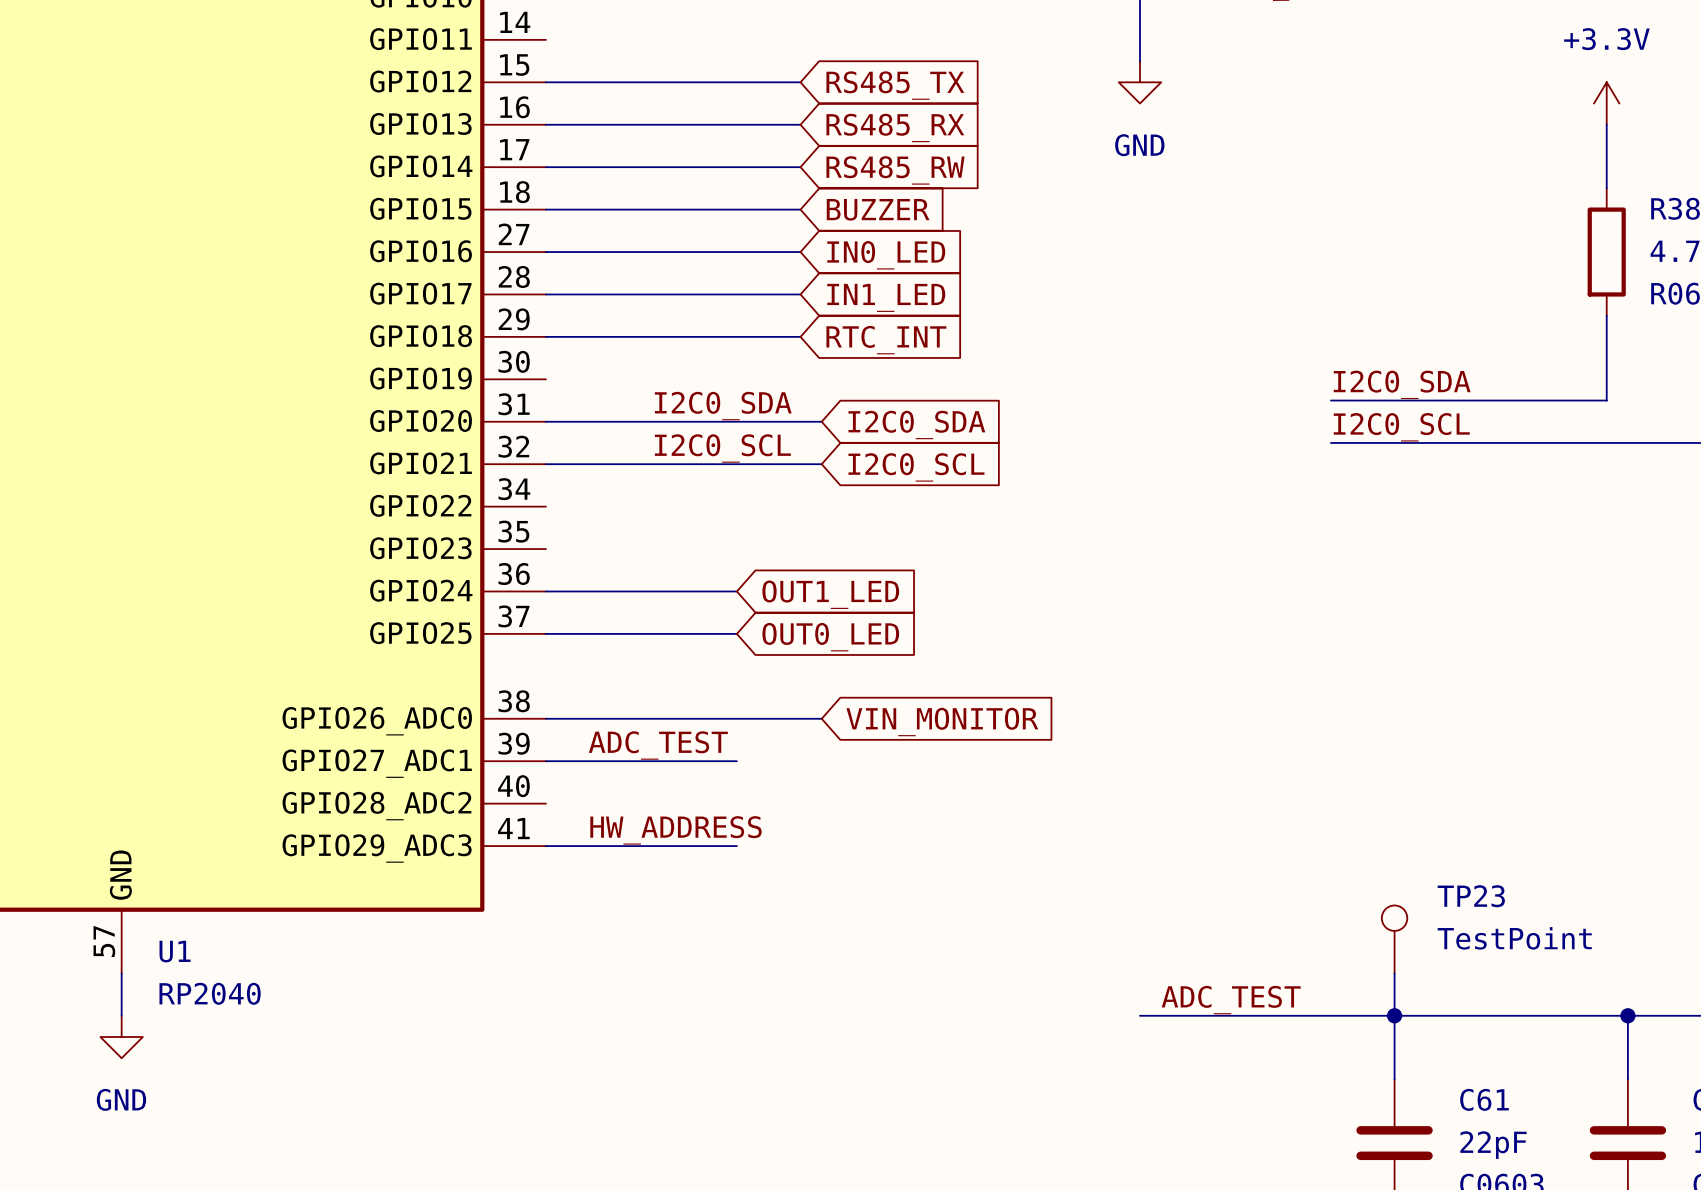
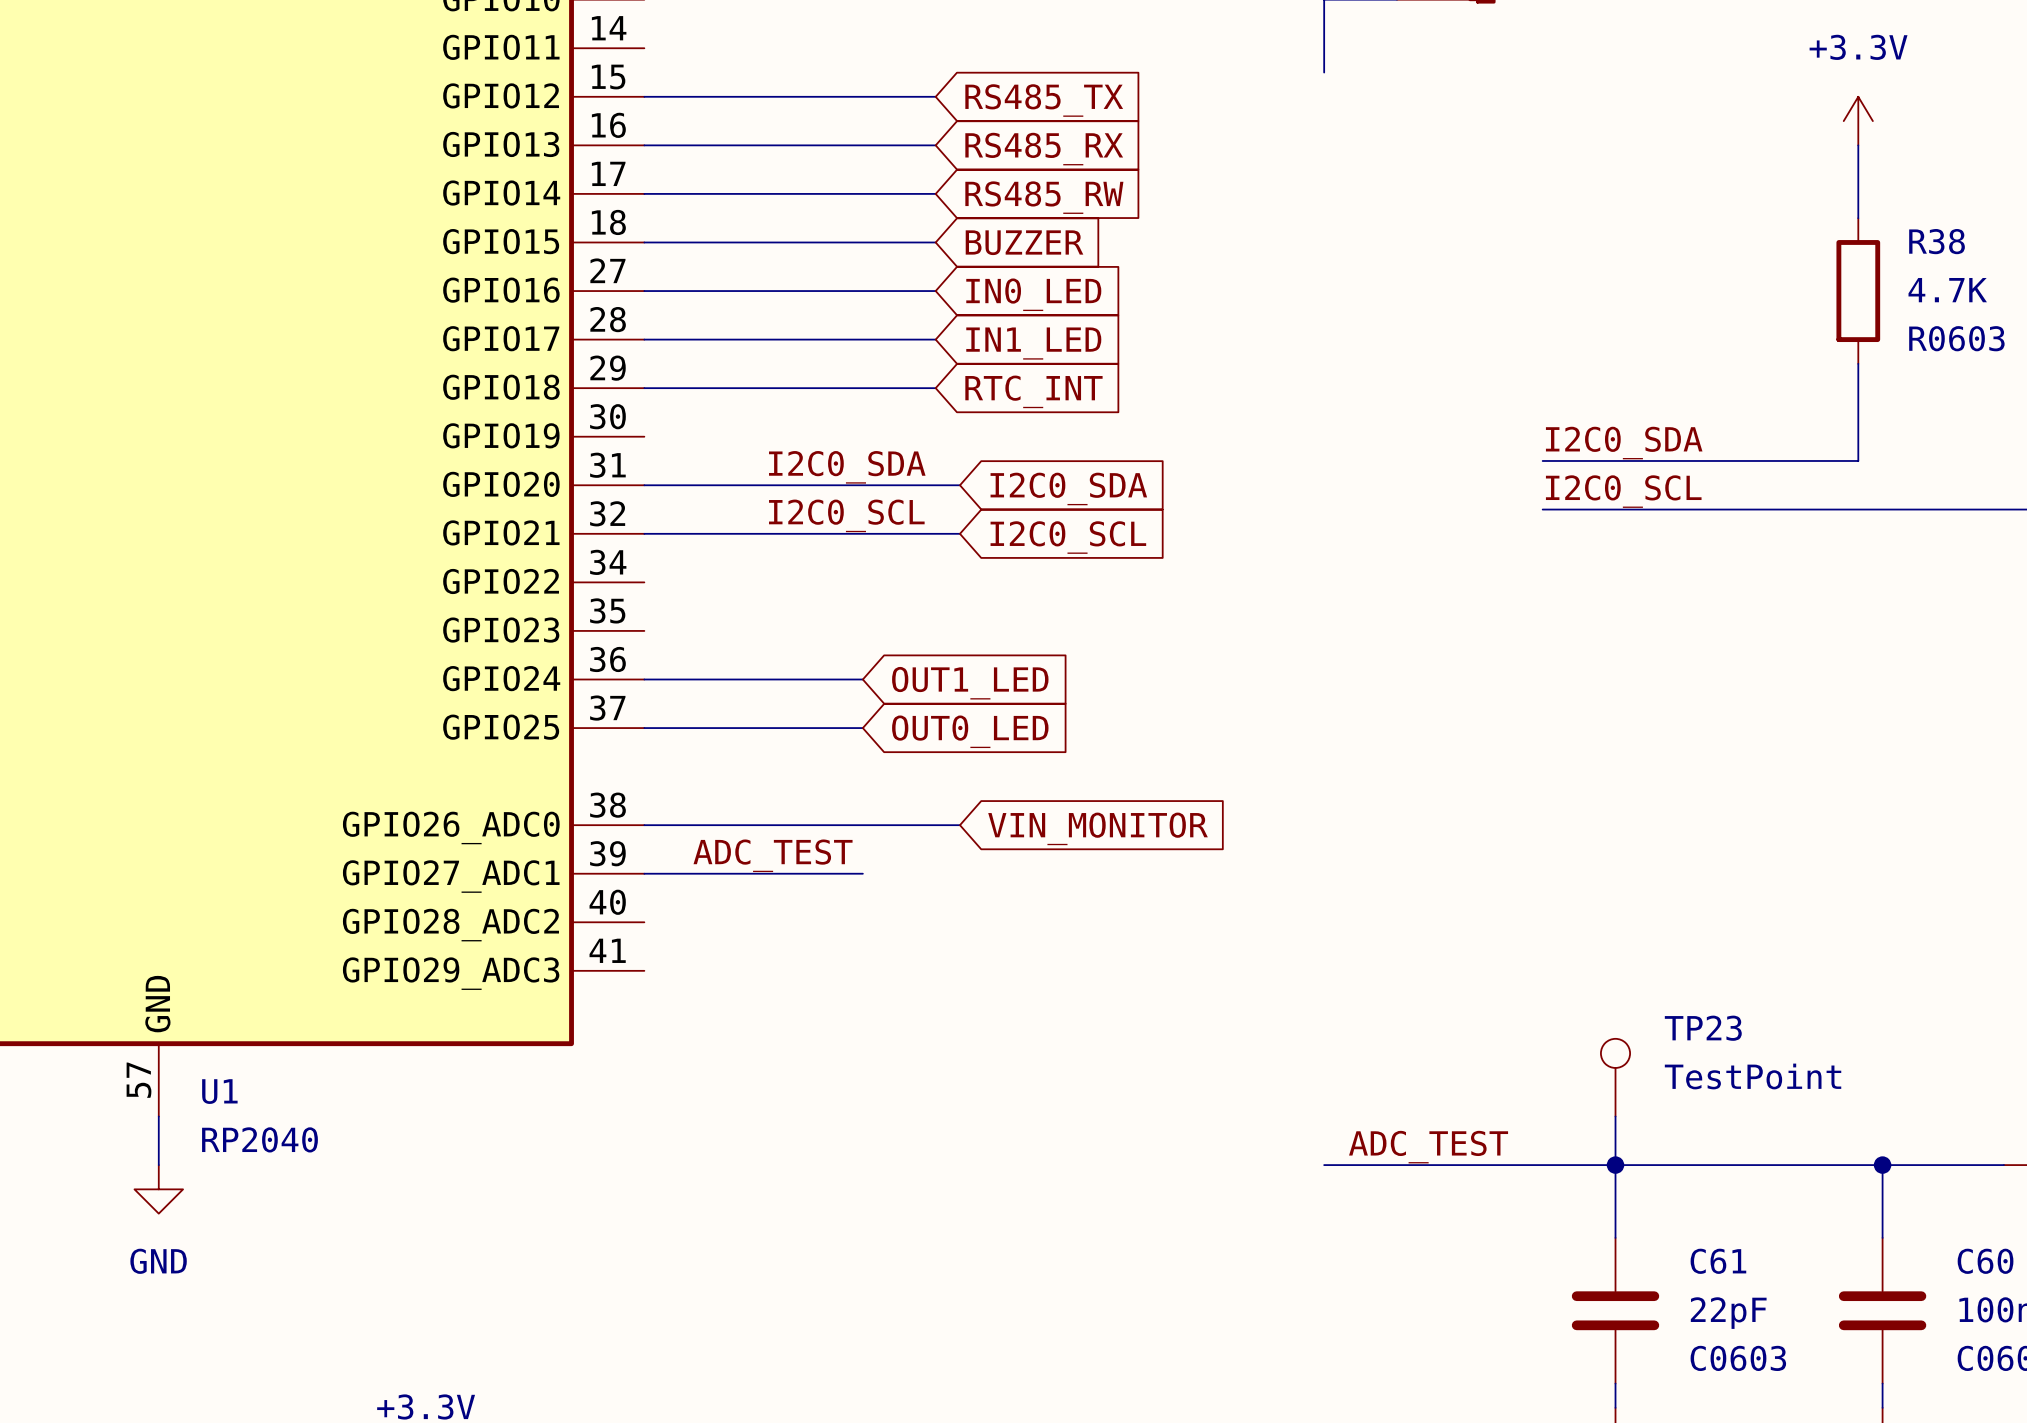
power symbol: GND (1139, 82) -> none
label: HW_ADDRESS (675, 830) -> none
wire: (545, 846) (736, 846) -> none

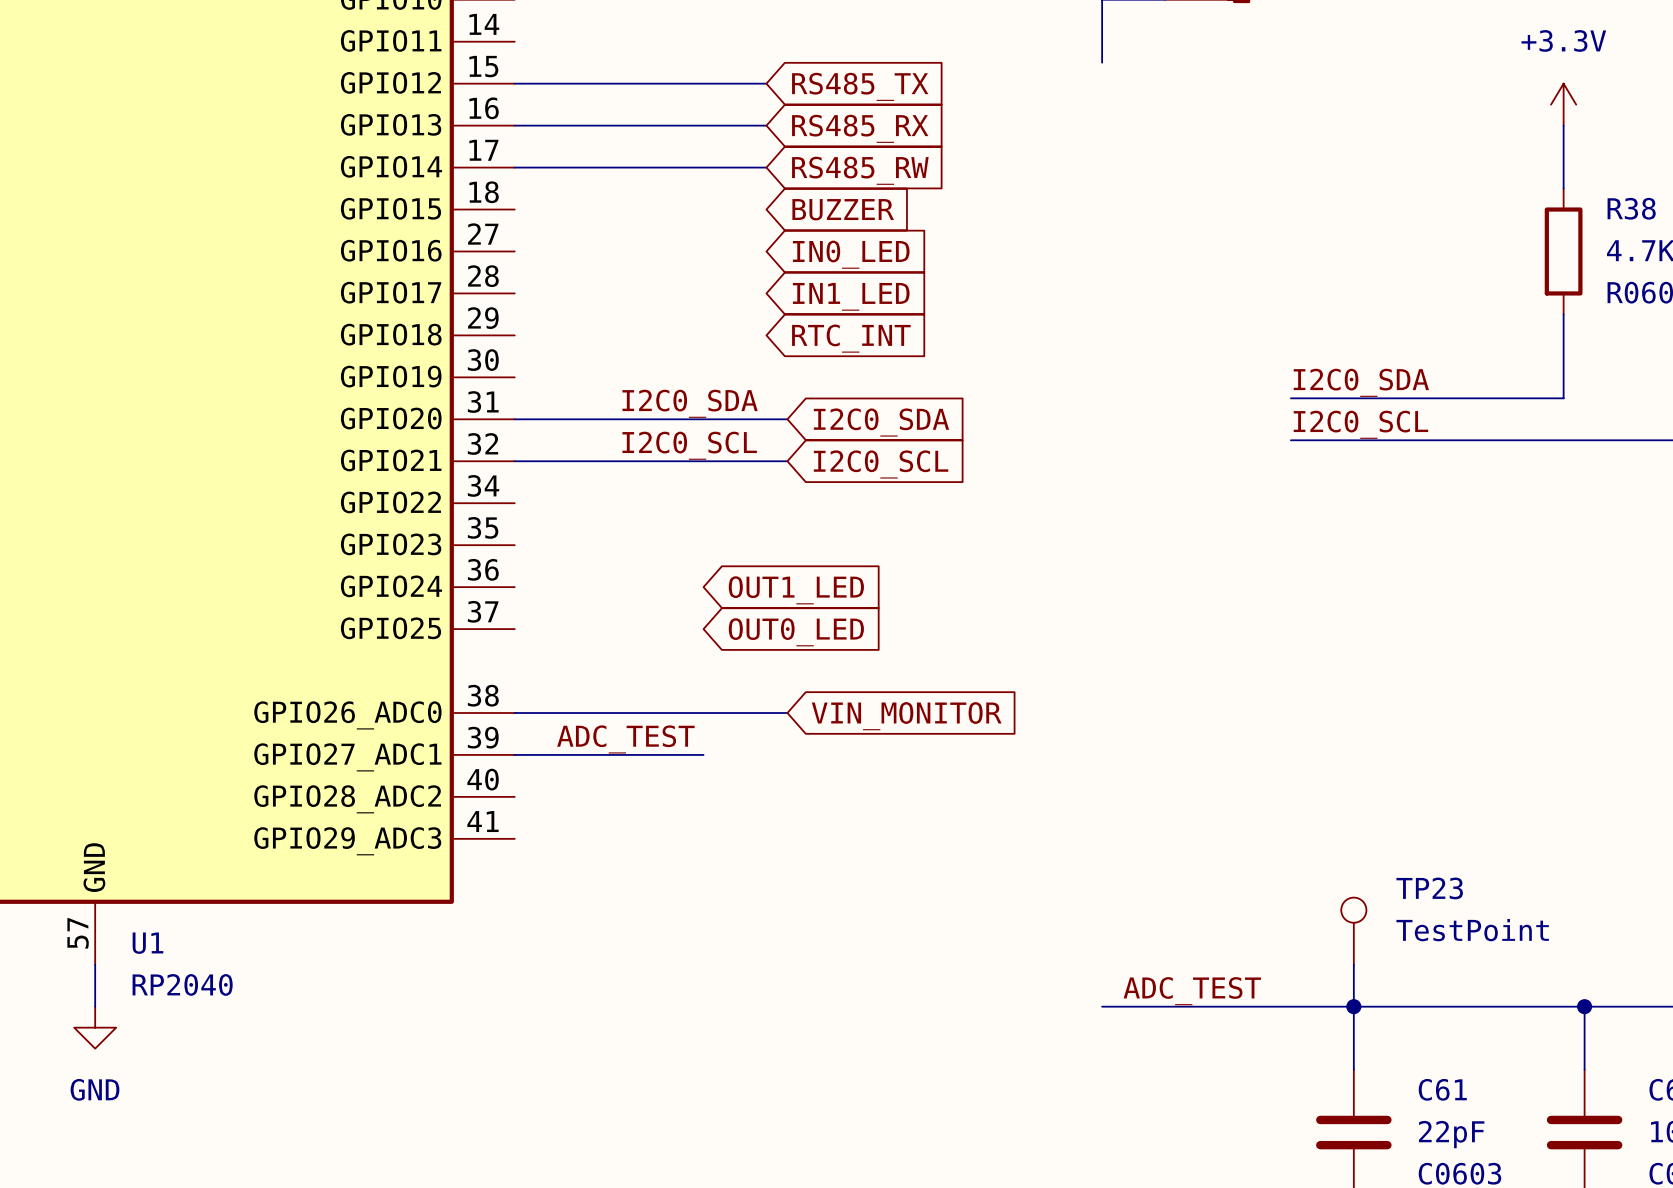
wire: (644, 242) (935, 242) -> none
wire: (644, 291) (935, 291) -> none
wire: (644, 339) (935, 339) -> none
wire: (644, 388) (935, 388) -> none
wire: (644, 679) (862, 679) -> none
wire: (644, 728) (862, 728) -> none

